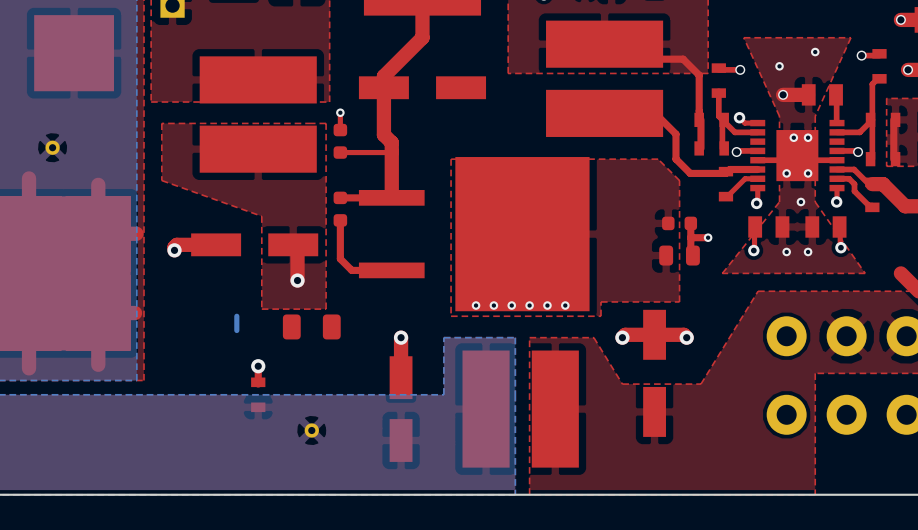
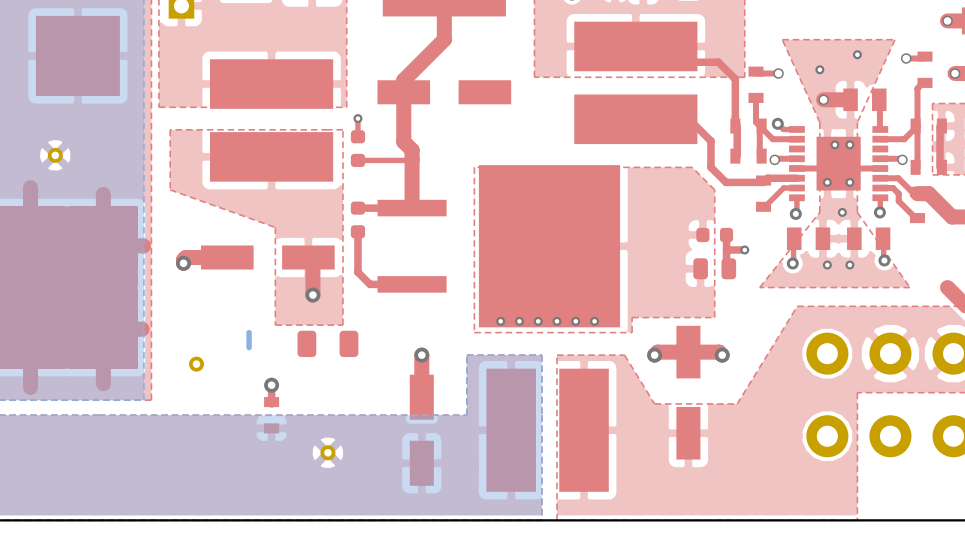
part: none -> (196, 364)

